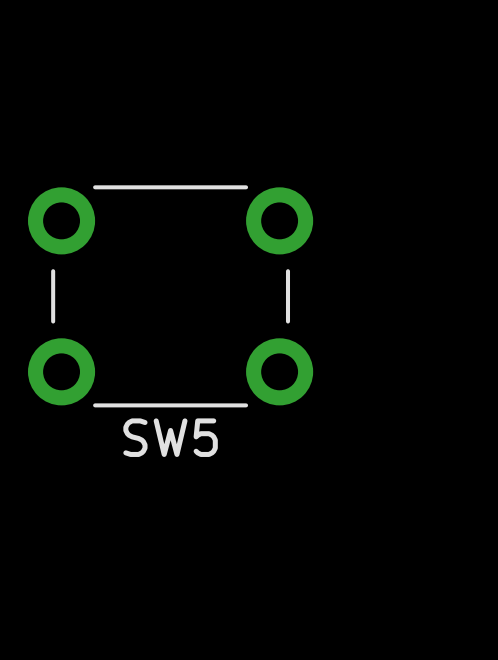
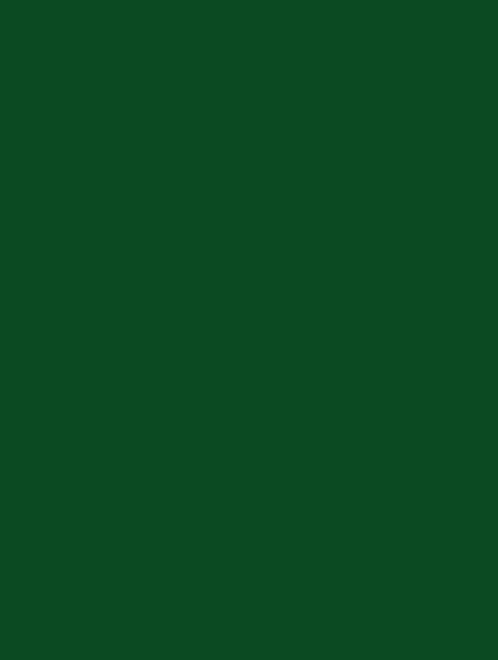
SW5: (170, 296) -> none

